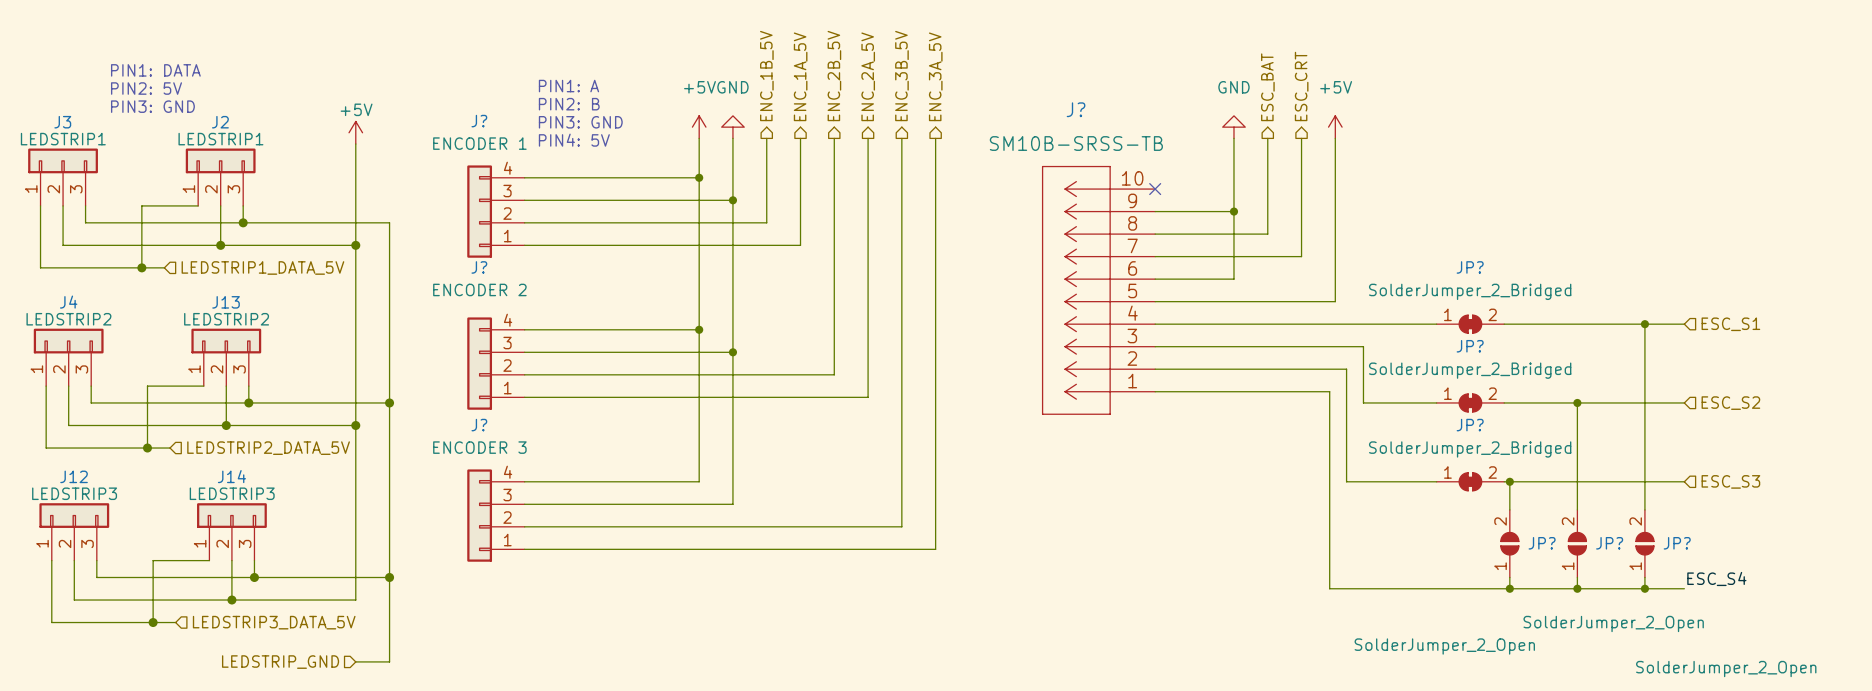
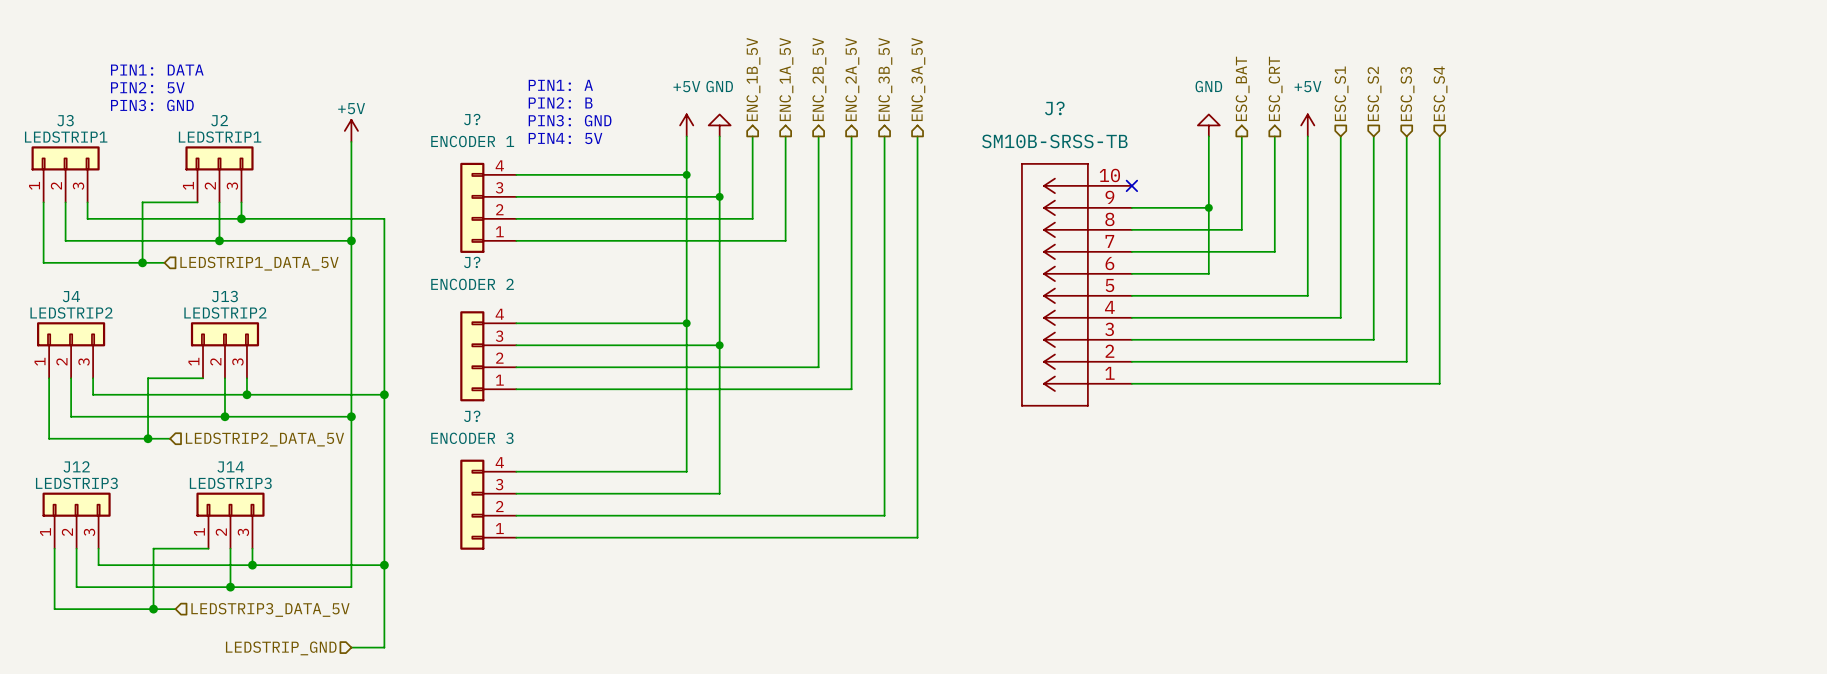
hierarchical label: none -> ESC_S1 (1341, 93)
hierarchical label: none -> ESC_S2 (1374, 93)
hierarchical label: none -> ESC_S3 (1407, 94)
hierarchical label: none -> ESC_S4 (1440, 93)
wire: (1369, 324) (1436, 324) -> (1340, 317) (1340, 136)
JP?: SolderJumper_2_Bridged (1470, 324) -> none
wire: (1504, 324) (1684, 324) -> none
wire: (1644, 324) (1644, 509) -> none
junction: (1644, 324) -> none
hierarchical label: ESC_S1 (1730, 324) -> none
wire: (1363, 346) (1363, 402) (1436, 402) -> (1335, 339) (1373, 339) (1373, 136)
wire: (1346, 369) (1346, 481) (1436, 481) -> (1318, 361) (1406, 361) (1406, 136)
wire: (1329, 391) (1329, 588) (1684, 588) -> (1302, 383) (1439, 383) (1439, 136)
JP?: SolderJumper_2_Bridged (1470, 402) -> none
wire: (1504, 402) (1684, 402) -> none
wire: (1577, 402) (1577, 509) -> none
junction: (1577, 402) -> none
hierarchical label: ESC_S2 (1730, 403) -> none
JP?: SolderJumper_2_Bridged (1470, 481) -> none
wire: (1504, 481) (1684, 481) -> none
wire: (1509, 481) (1509, 509) -> none
junction: (1509, 481) -> none
hierarchical label: ESC_S3 (1730, 481) -> none
JP?: SolderJumper_2_Open (1509, 543) -> none
JP?: SolderJumper_2_Open (1577, 543) -> none
JP?: SolderJumper_2_Open (1644, 543) -> none
wire: (1509, 577) (1509, 588) -> none
wire: (1577, 577) (1577, 588) -> none
wire: (1644, 577) (1644, 588) -> none
label: ESC_S4 (1716, 578) -> none
junction: (1509, 588) -> none
junction: (1577, 588) -> none
junction: (1644, 588) -> none

